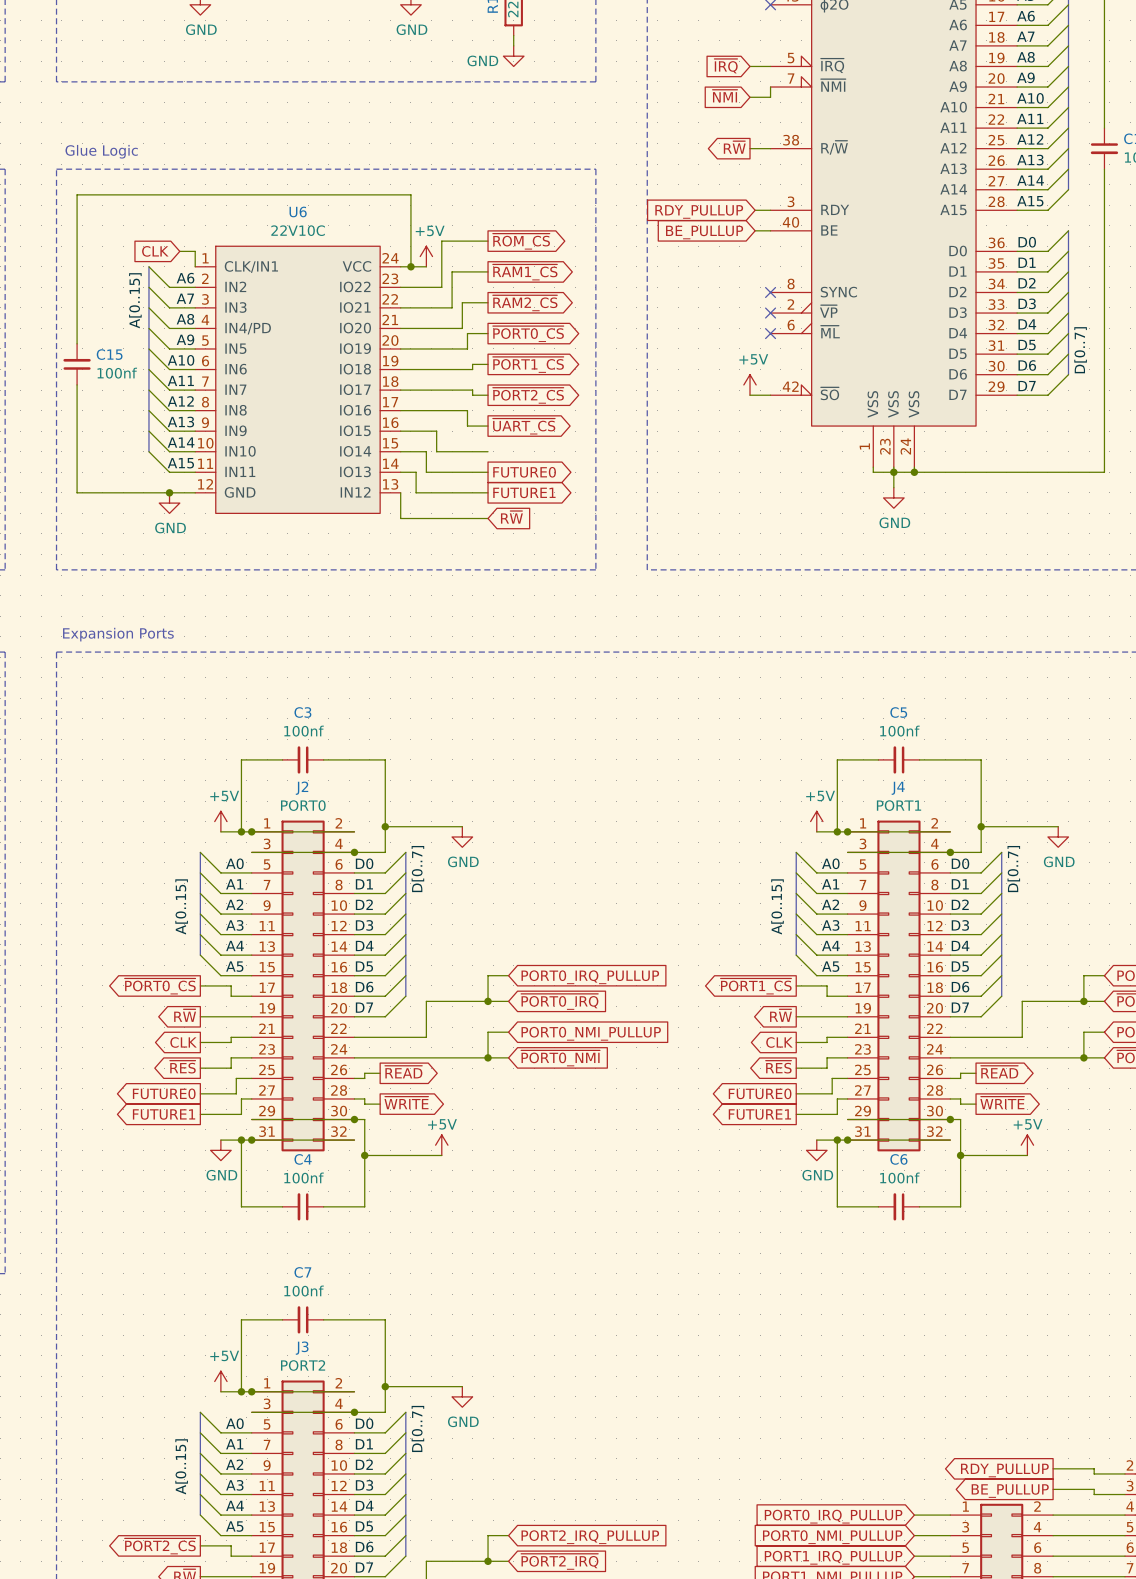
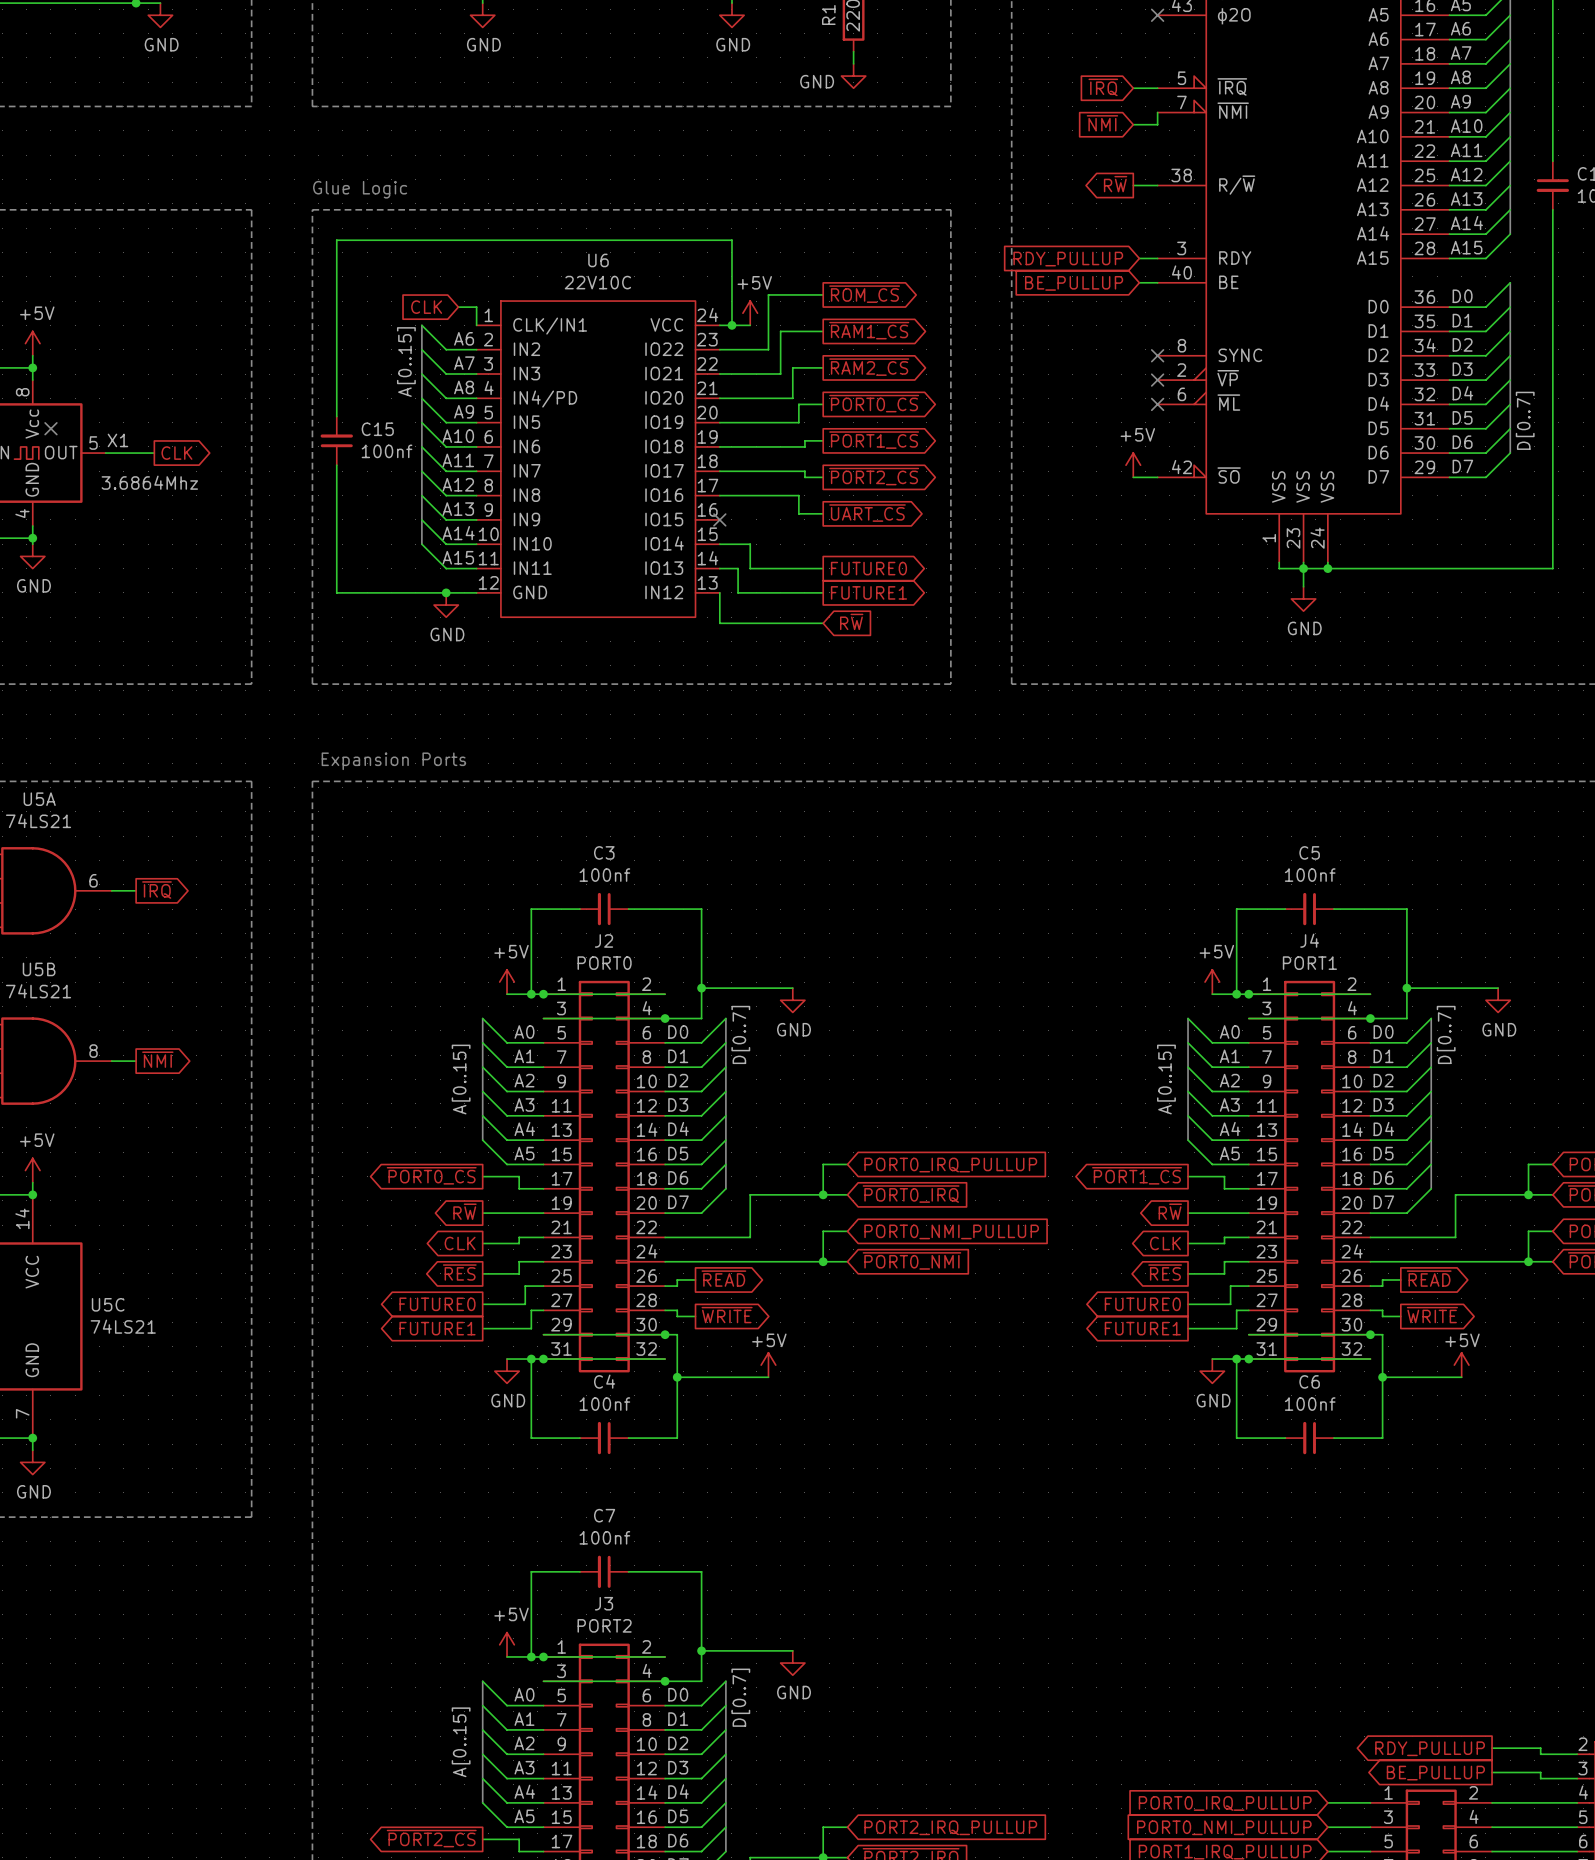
wire: (400, 431) (436, 431) (436, 451) (488, 451) -> none
no-connect mark: none -> (719, 519)

